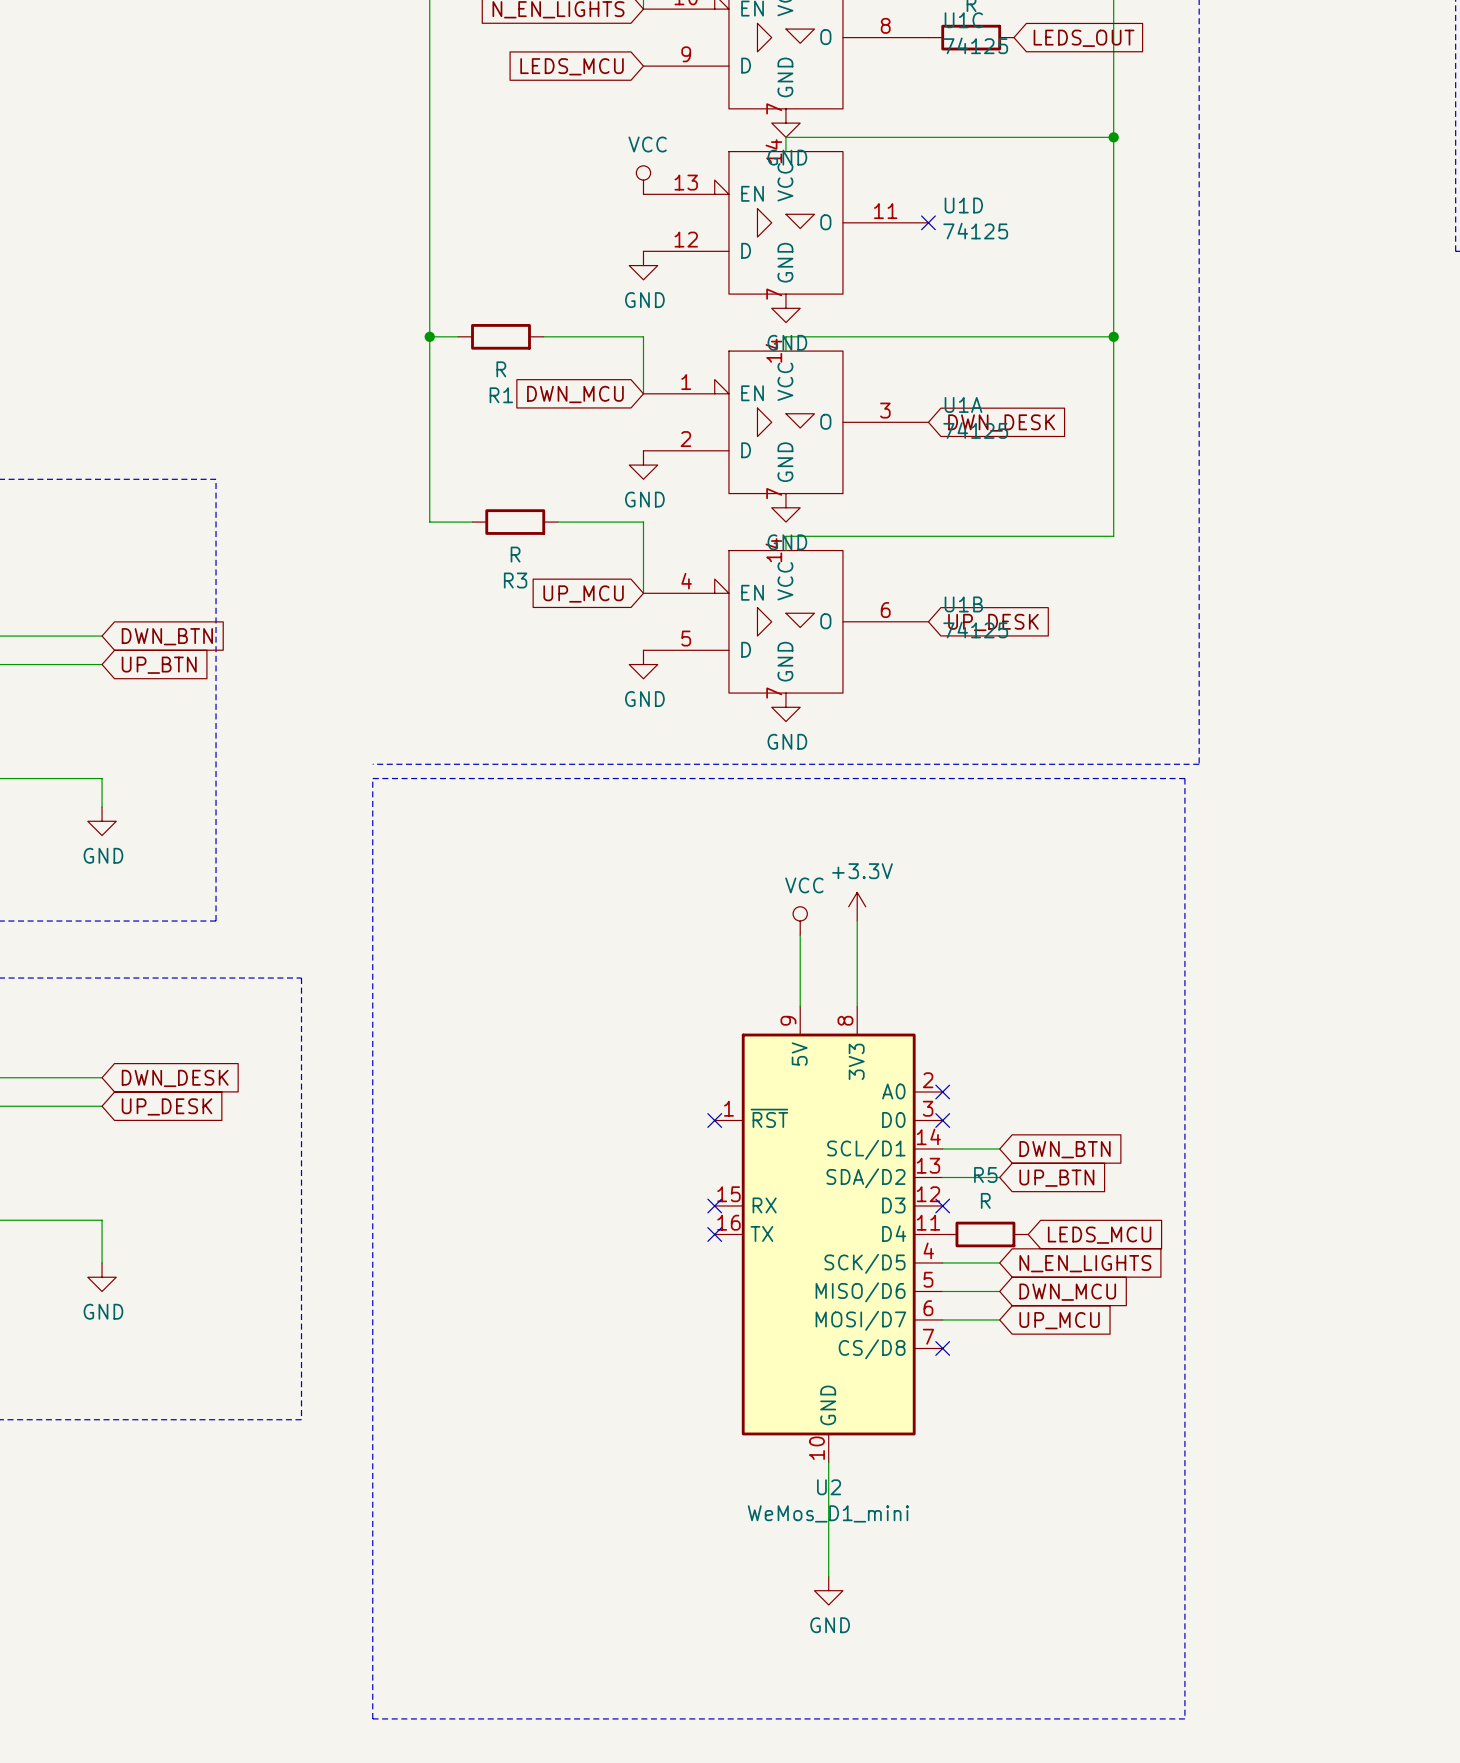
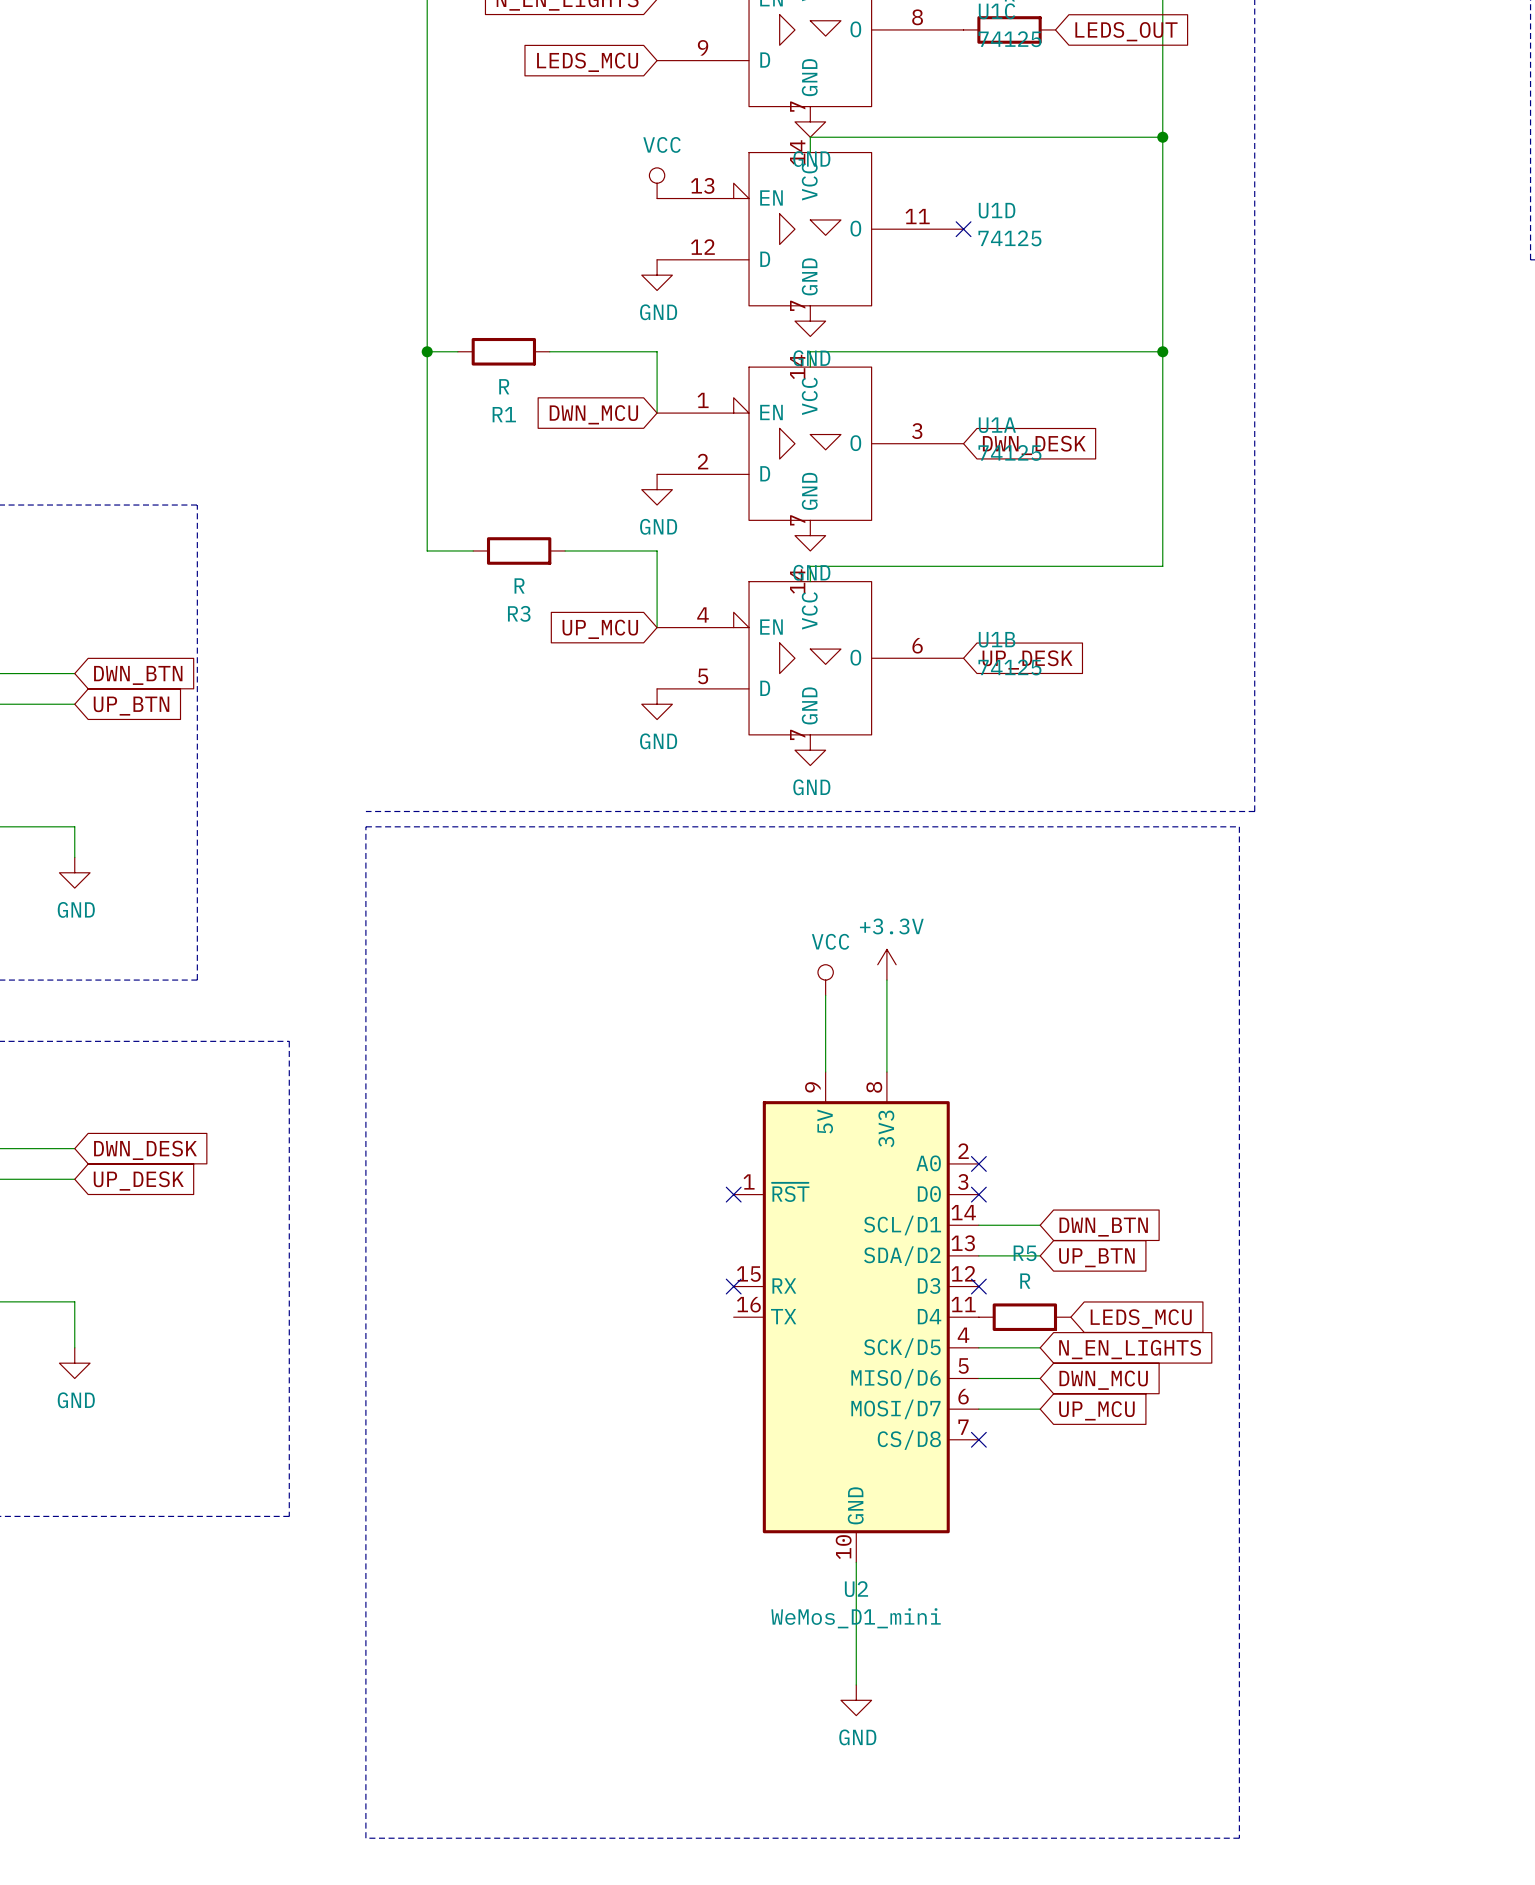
no-connect mark: (714, 1234) -> none

